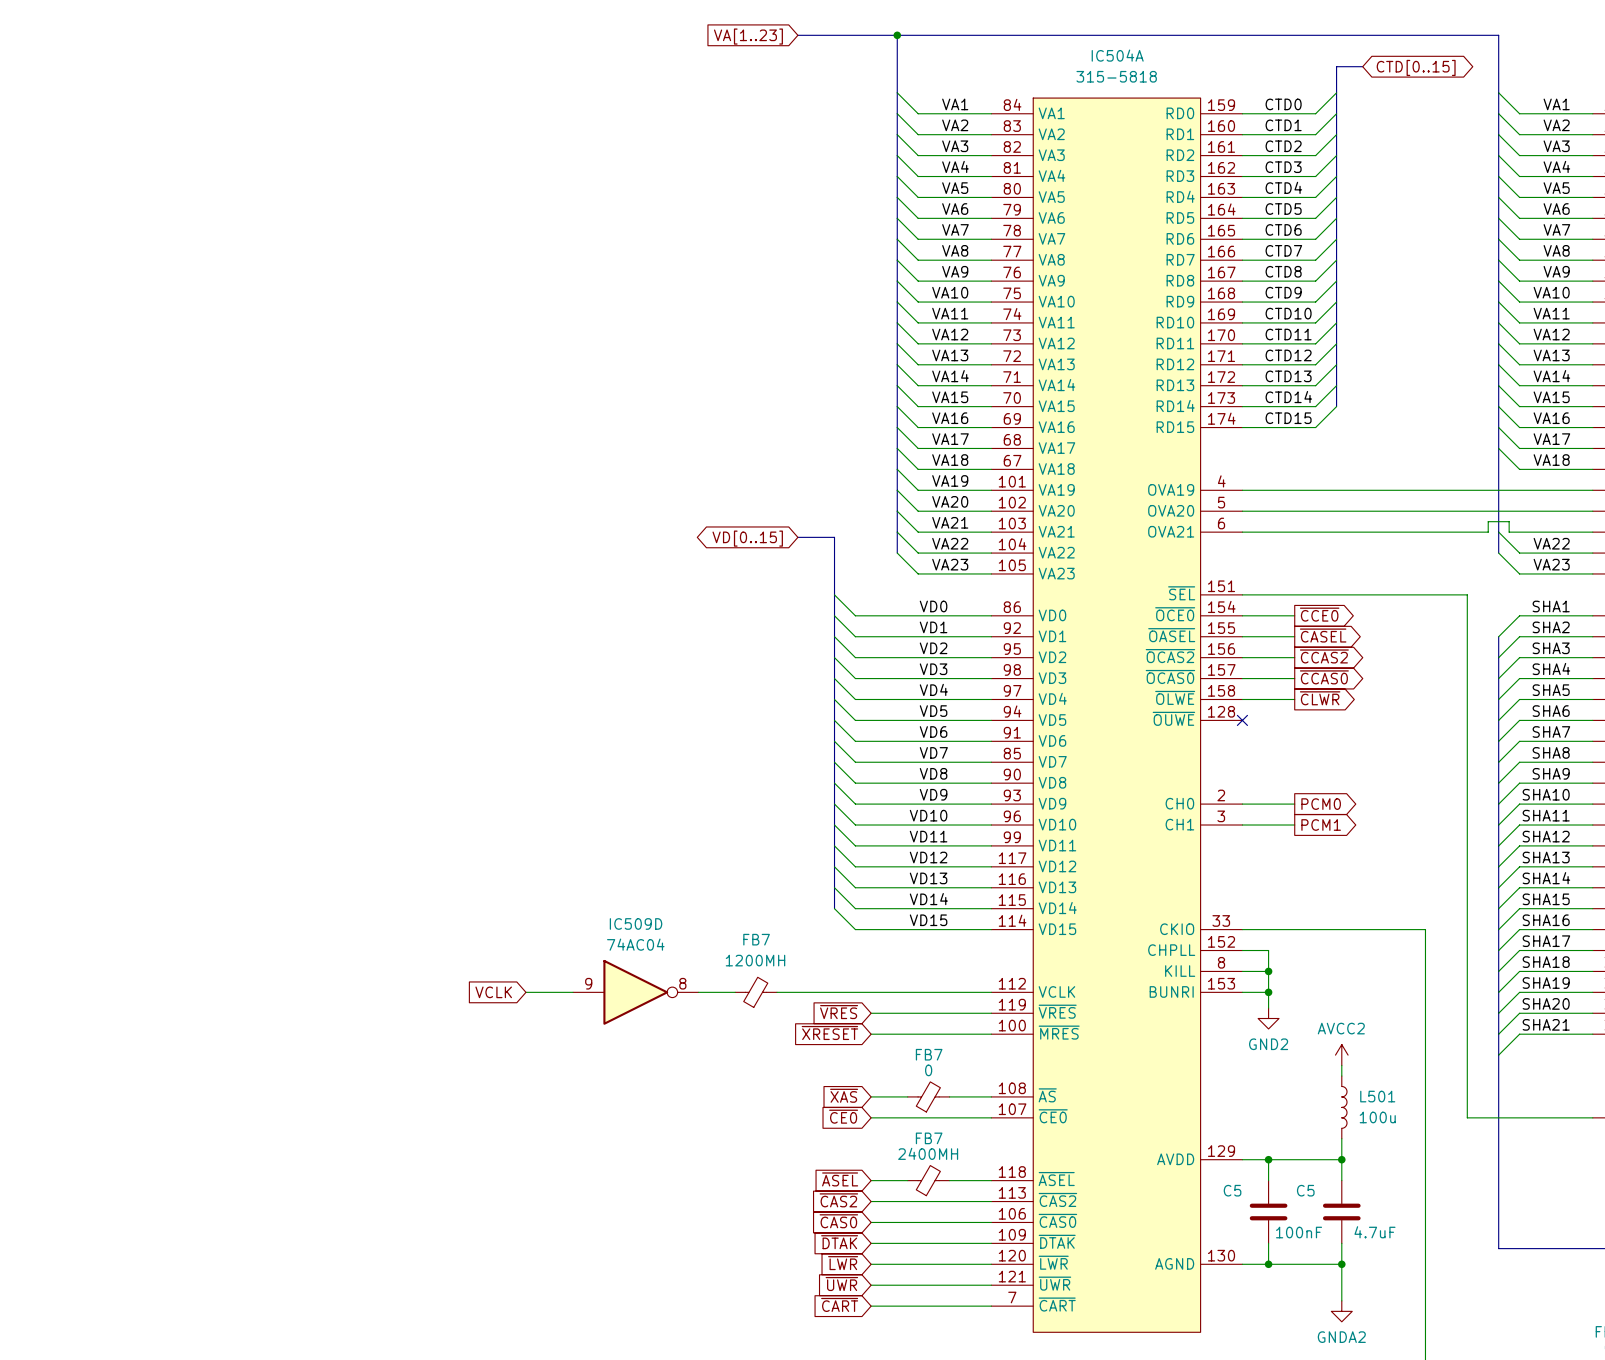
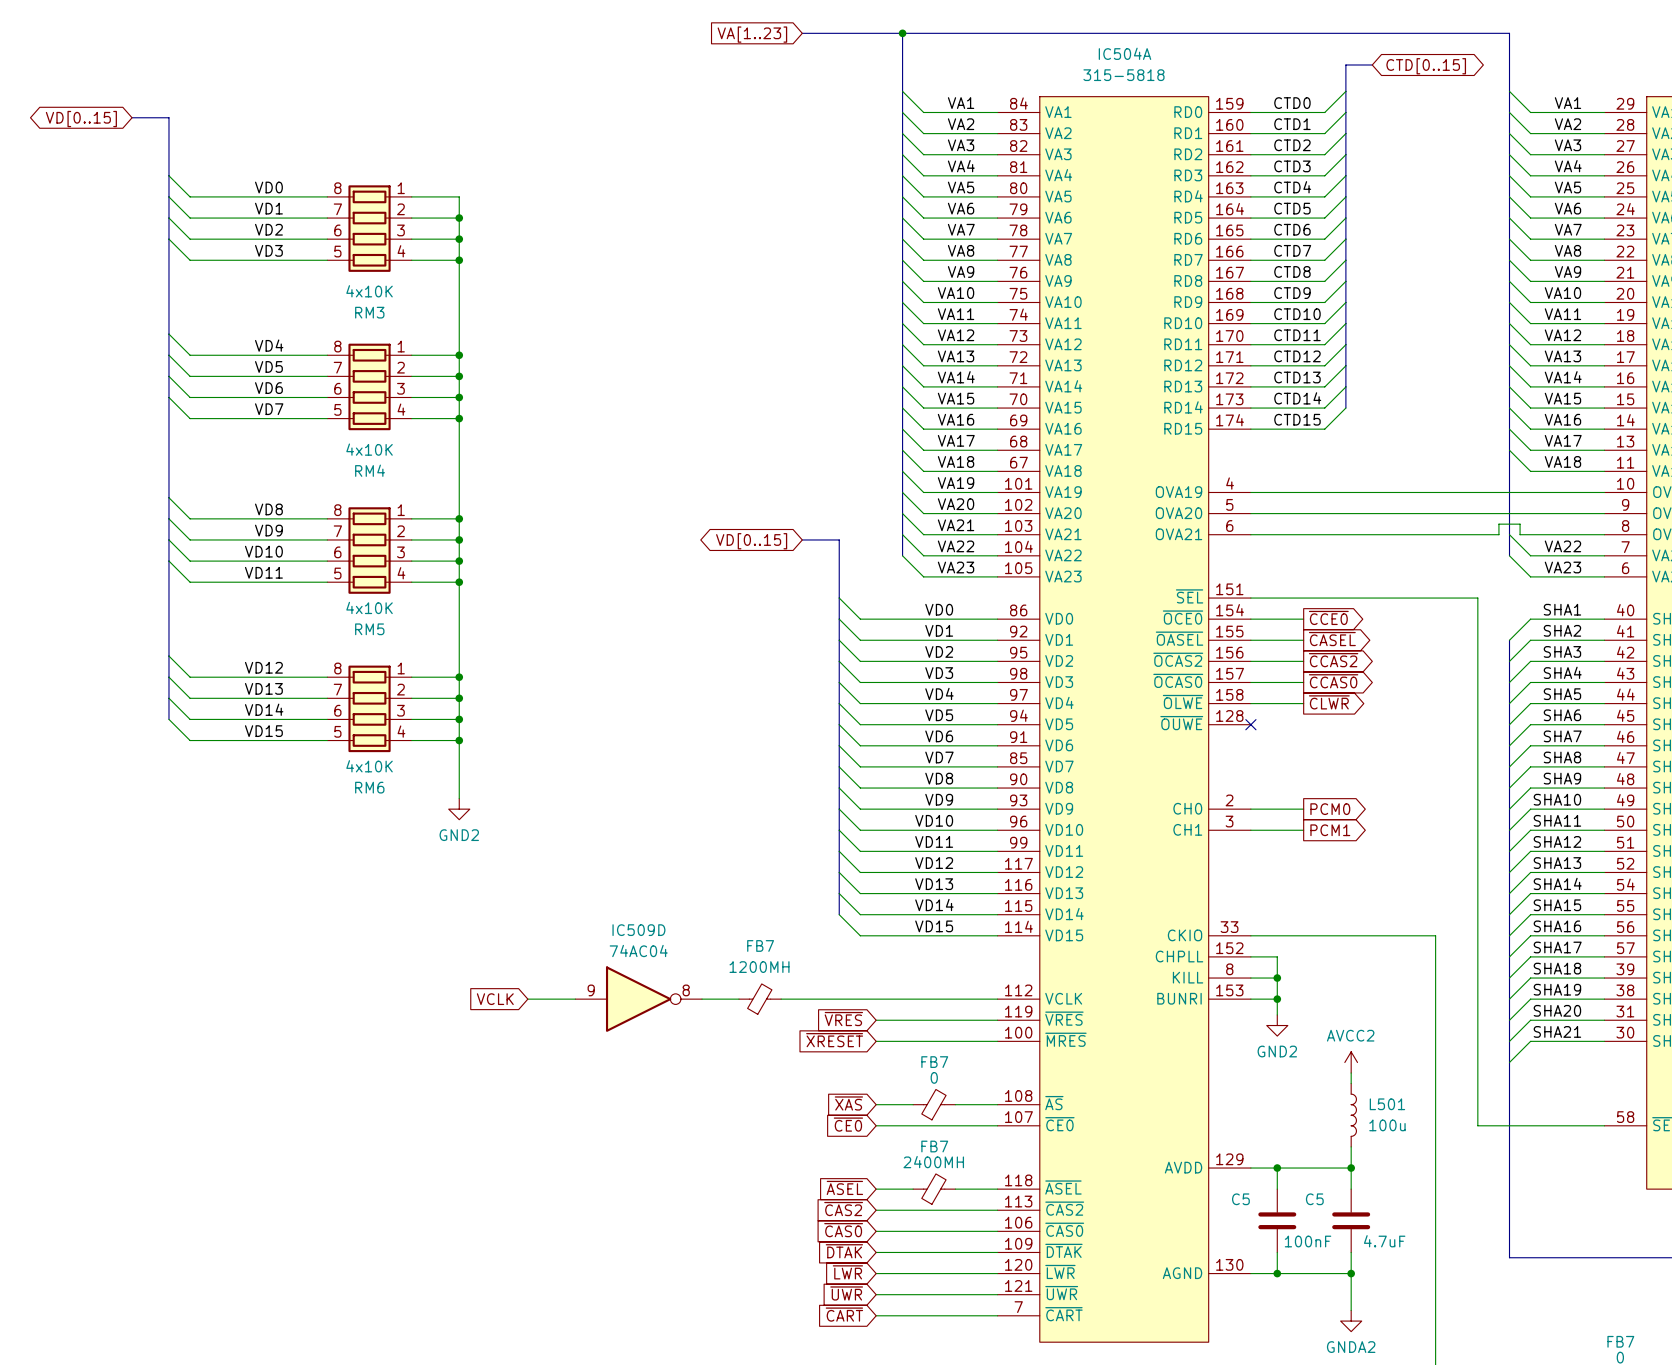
bus: none -> (132, 117) (168, 117) (168, 719)
global label: none -> VD[0..15] (81, 119)
wire: none -> (168, 175) (190, 196)
label: none -> VD0 (268, 187)
wire: none -> (168, 196) (190, 218) (327, 218)
wire: none -> (190, 196) (327, 196)
wire: none -> (411, 196) (459, 196) (459, 798)
label: none -> VD1 (268, 208)
wire: none -> (168, 218) (190, 239) (327, 239)
wire: none -> (411, 218) (459, 218)
junction: none -> (459, 218)
RM3: none -> 4x10K (369, 228)
label: none -> VD2 (268, 229)
wire: none -> (168, 239) (190, 260)
wire: none -> (411, 239) (459, 239)
junction: none -> (459, 239)
label: none -> VD3 (268, 250)
wire: none -> (190, 260) (327, 260)
wire: none -> (411, 260) (459, 260)
junction: none -> (459, 260)
wire: none -> (168, 334) (190, 355) (327, 355)
label: none -> VD4 (269, 345)
wire: none -> (168, 355) (190, 376) (327, 376)
wire: none -> (411, 355) (459, 355)
junction: none -> (459, 355)
label: none -> VD5 (268, 366)
wire: none -> (168, 376) (190, 397)
wire: none -> (411, 376) (459, 376)
junction: none -> (459, 376)
RM4: none -> 4x10K (369, 386)
label: none -> VD6 (268, 388)
wire: none -> (168, 397) (190, 418) (327, 418)
wire: none -> (190, 397) (327, 397)
wire: none -> (411, 397) (459, 397)
junction: none -> (459, 397)
label: none -> VD7 (269, 409)
wire: none -> (411, 418) (459, 418)
junction: none -> (459, 418)
wire: none -> (168, 497) (190, 518) (327, 518)
label: none -> VD8 (268, 509)
wire: none -> (168, 518) (190, 539) (327, 539)
wire: none -> (411, 518) (459, 518)
junction: none -> (459, 518)
label: none -> VD9 (268, 530)
wire: none -> (168, 539) (190, 561) (327, 561)
wire: none -> (411, 539) (459, 539)
junction: none -> (459, 539)
RM5: none -> 4x10K (369, 550)
label: none -> VD10 (263, 551)
wire: none -> (168, 561) (190, 582) (327, 582)
wire: none -> (411, 561) (459, 561)
junction: none -> (459, 561)
label: none -> VD11 (263, 572)
wire: none -> (411, 582) (459, 582)
junction: none -> (459, 582)
wire: none -> (168, 656) (190, 677) (327, 677)
label: none -> VD12 (263, 667)
wire: none -> (168, 677) (190, 698) (327, 698)
wire: none -> (411, 677) (459, 677)
junction: none -> (459, 677)
label: none -> VD13 (263, 688)
wire: none -> (168, 698) (190, 719) (327, 719)
wire: none -> (411, 698) (459, 698)
junction: none -> (459, 698)
RM6: none -> 4x10K (369, 708)
label: none -> VD14 (264, 709)
wire: none -> (168, 719) (190, 740) (327, 740)
wire: none -> (411, 719) (459, 719)
junction: none -> (459, 719)
label: none -> VD15 (263, 731)
wire: none -> (411, 740) (459, 740)
junction: none -> (459, 740)
power symbol: none -> GND2 (459, 809)

